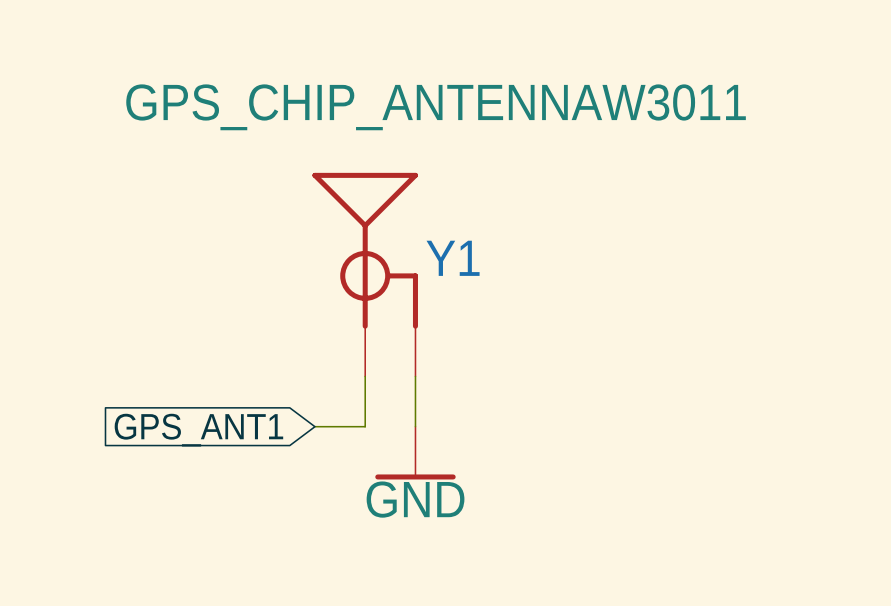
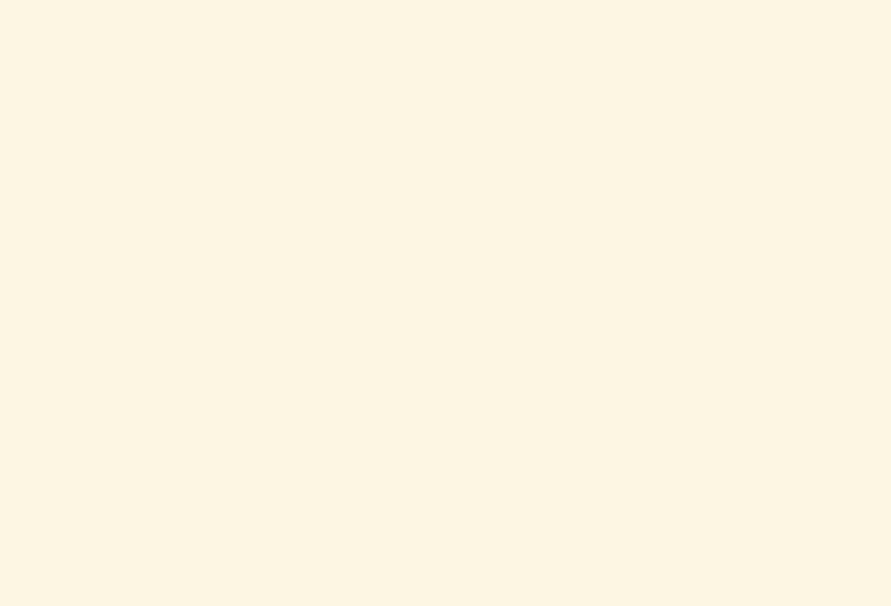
Y1: GPS_CHIP_ANTENNAW3011 (365, 274) -> none
wire: (365, 376) (365, 426) (314, 426) -> none
wire: (415, 376) (415, 426) -> none
global label: GPS_ANT1 (198, 430) -> none
power symbol: GND (415, 453) -> none

